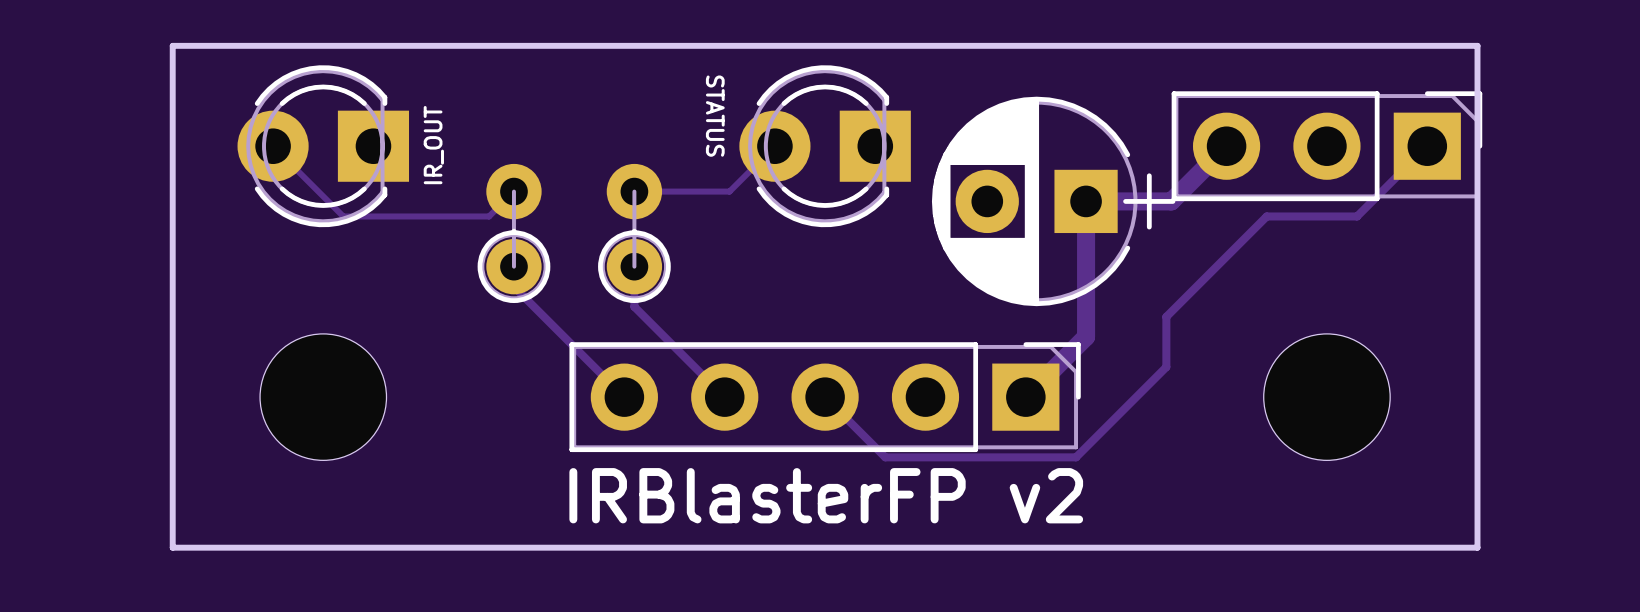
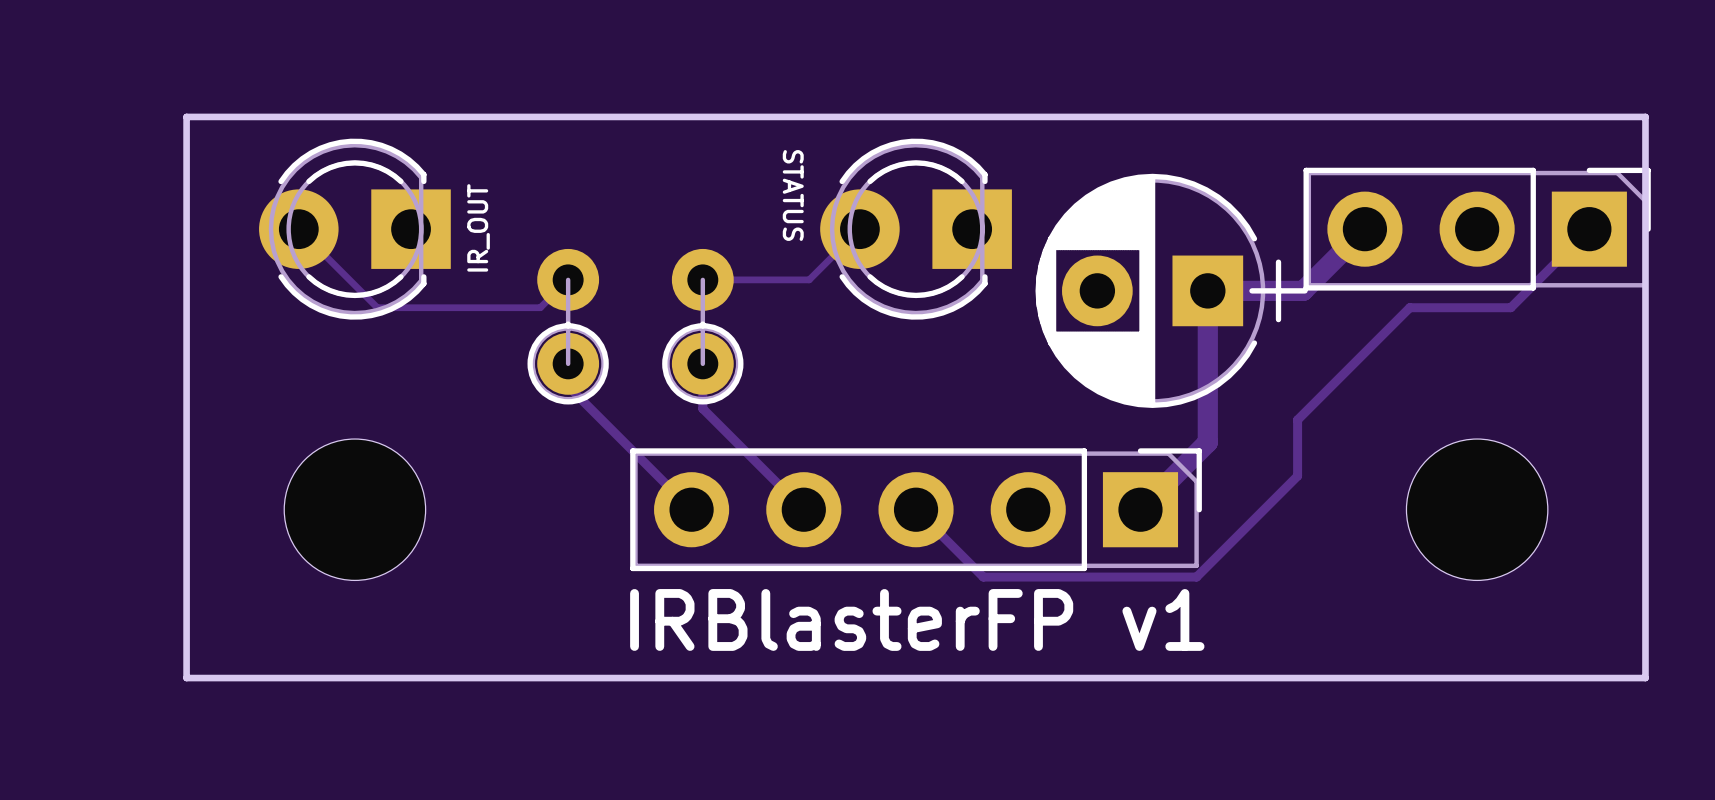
text: IRBlasterFP v2 (826, 495) -> IRBlasterFP v1 (917, 619)

